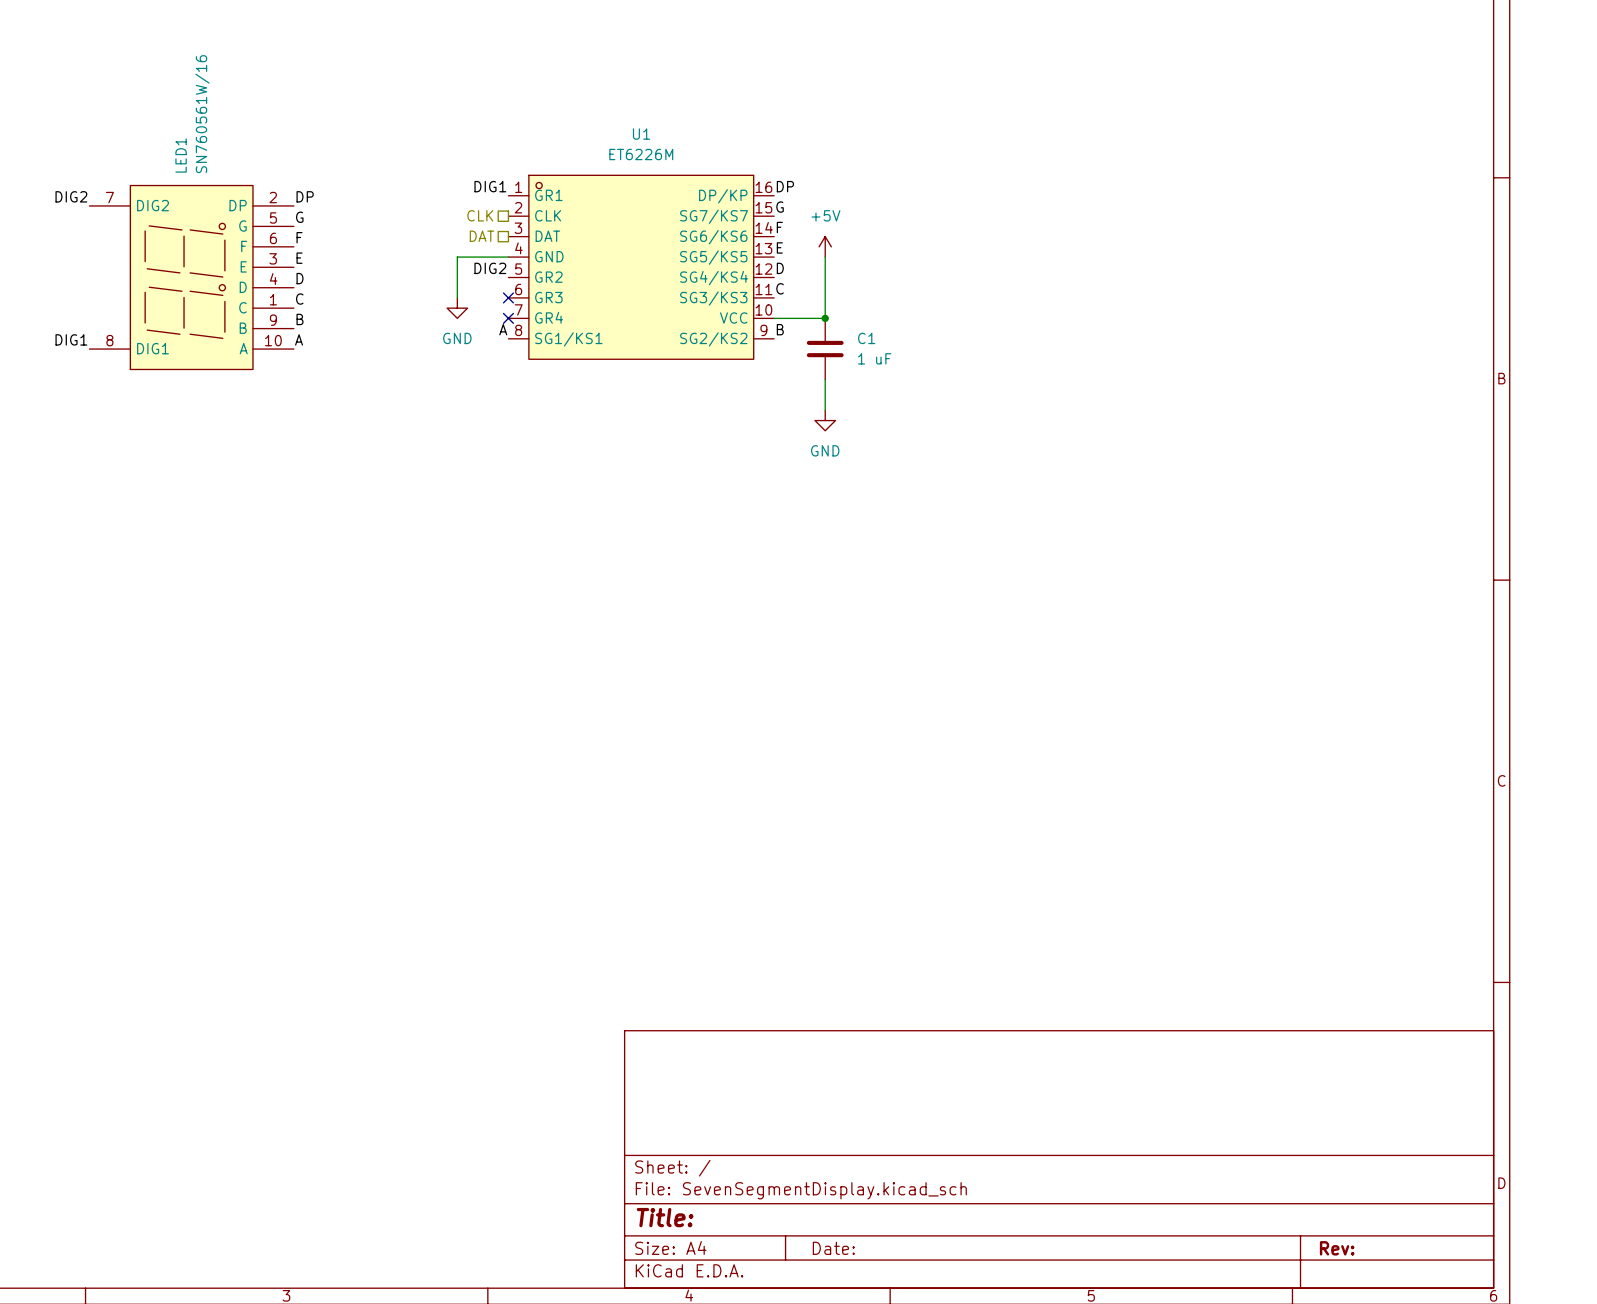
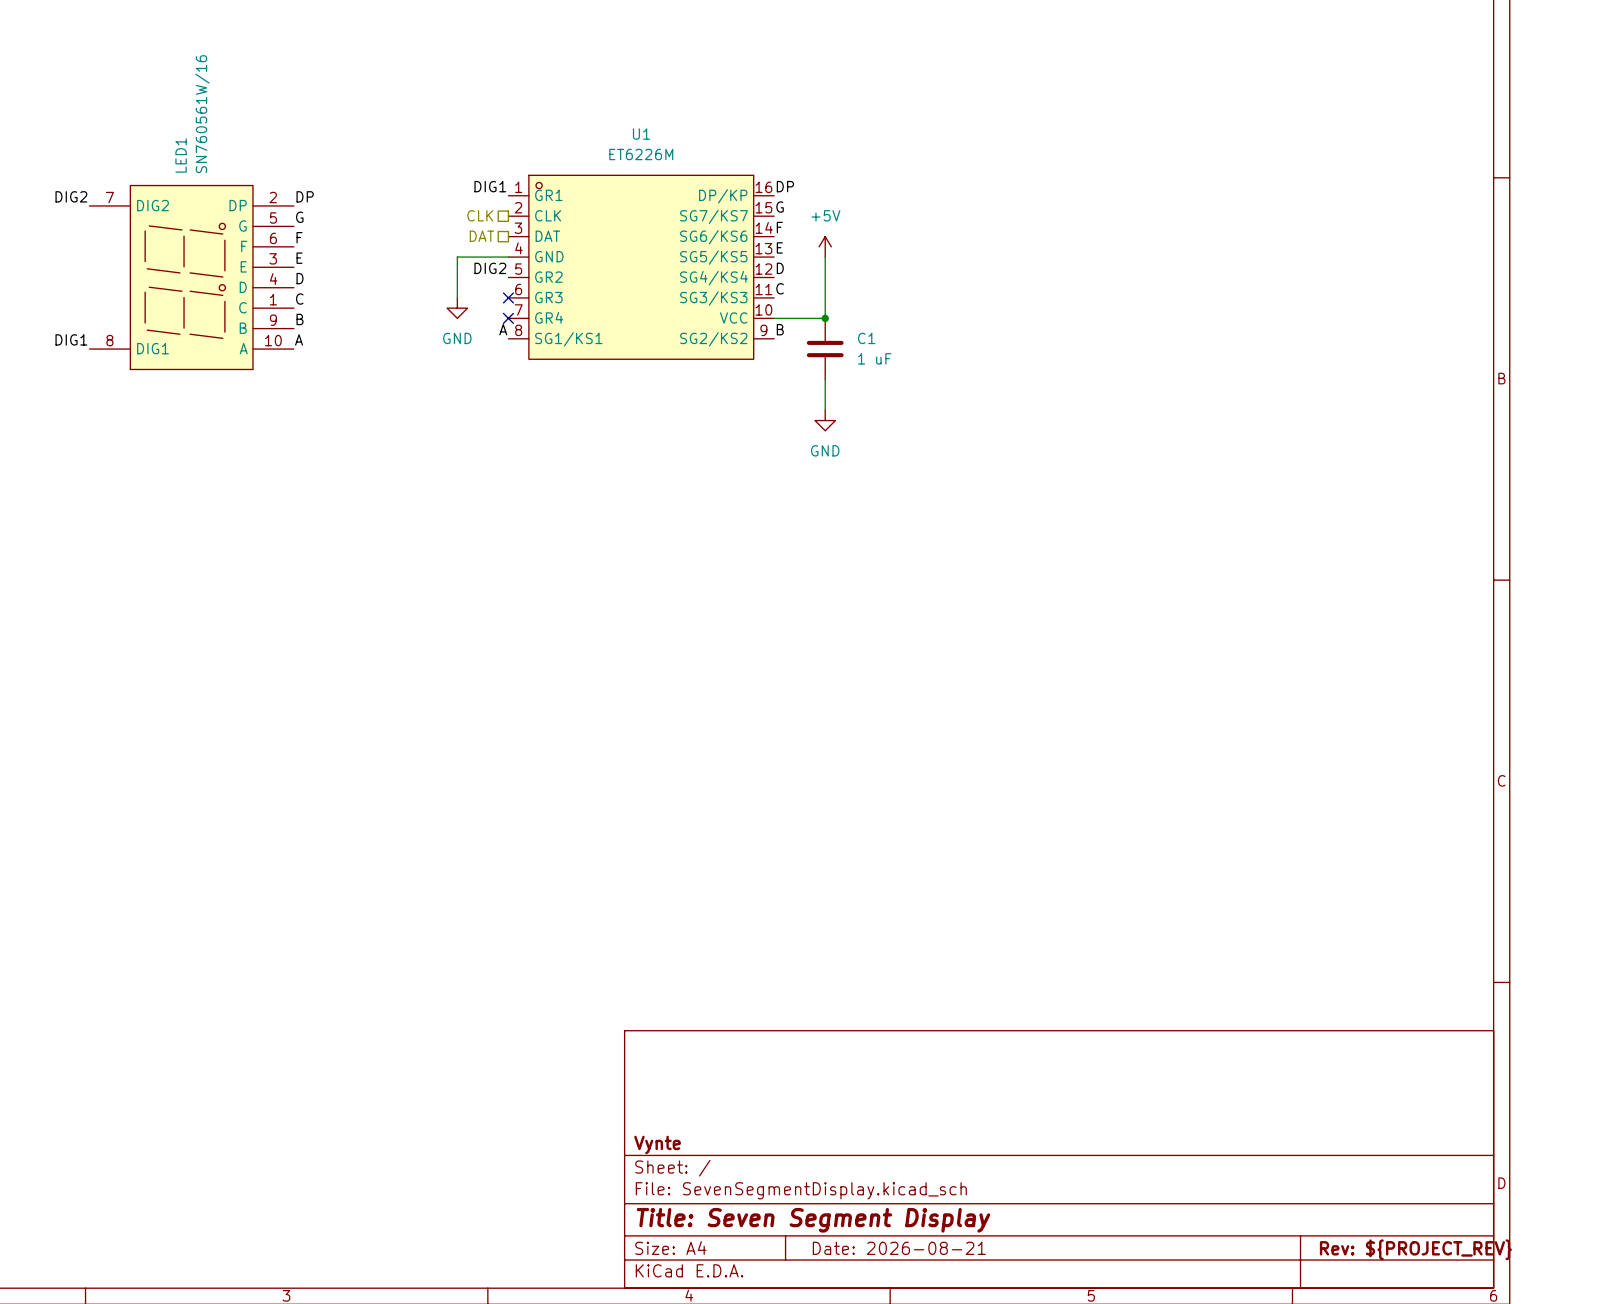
title block: none -> Vynte (657, 1144)
title block: Title: (665, 1217) -> Title: Seven Segment Display (813, 1220)
title block: Date: (833, 1248) -> Date: 2026-08-21 (899, 1248)
title block: Rev: (1337, 1248) -> Rev: ${PROJECT_REV} (1415, 1249)

